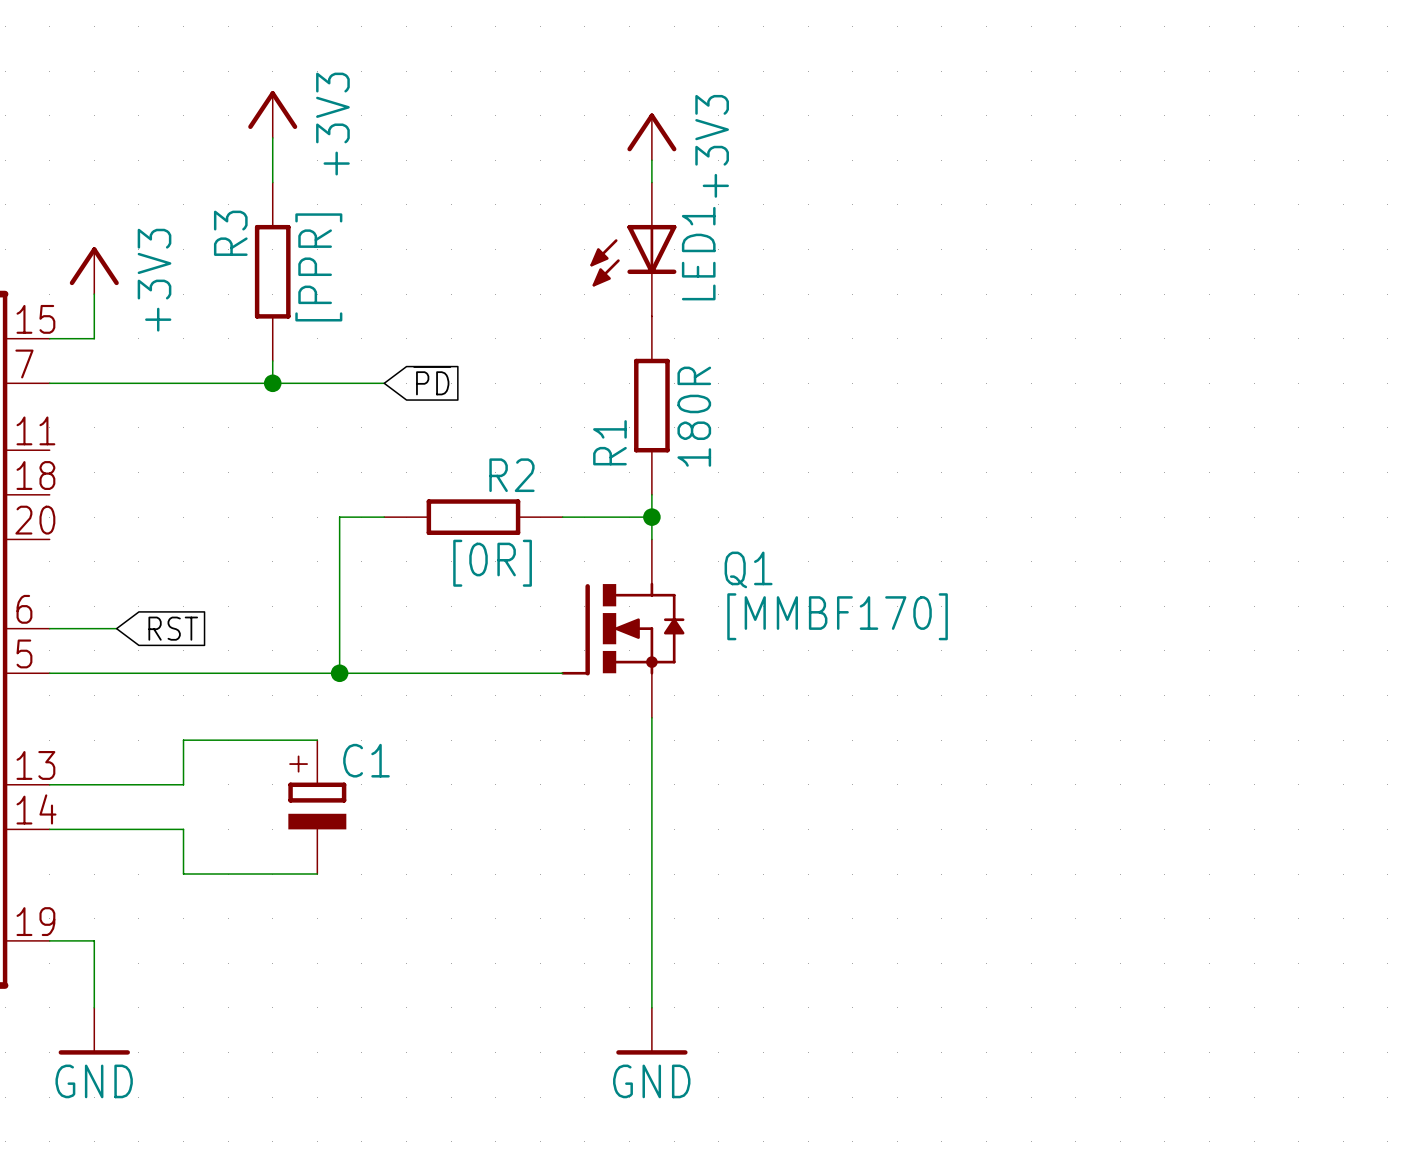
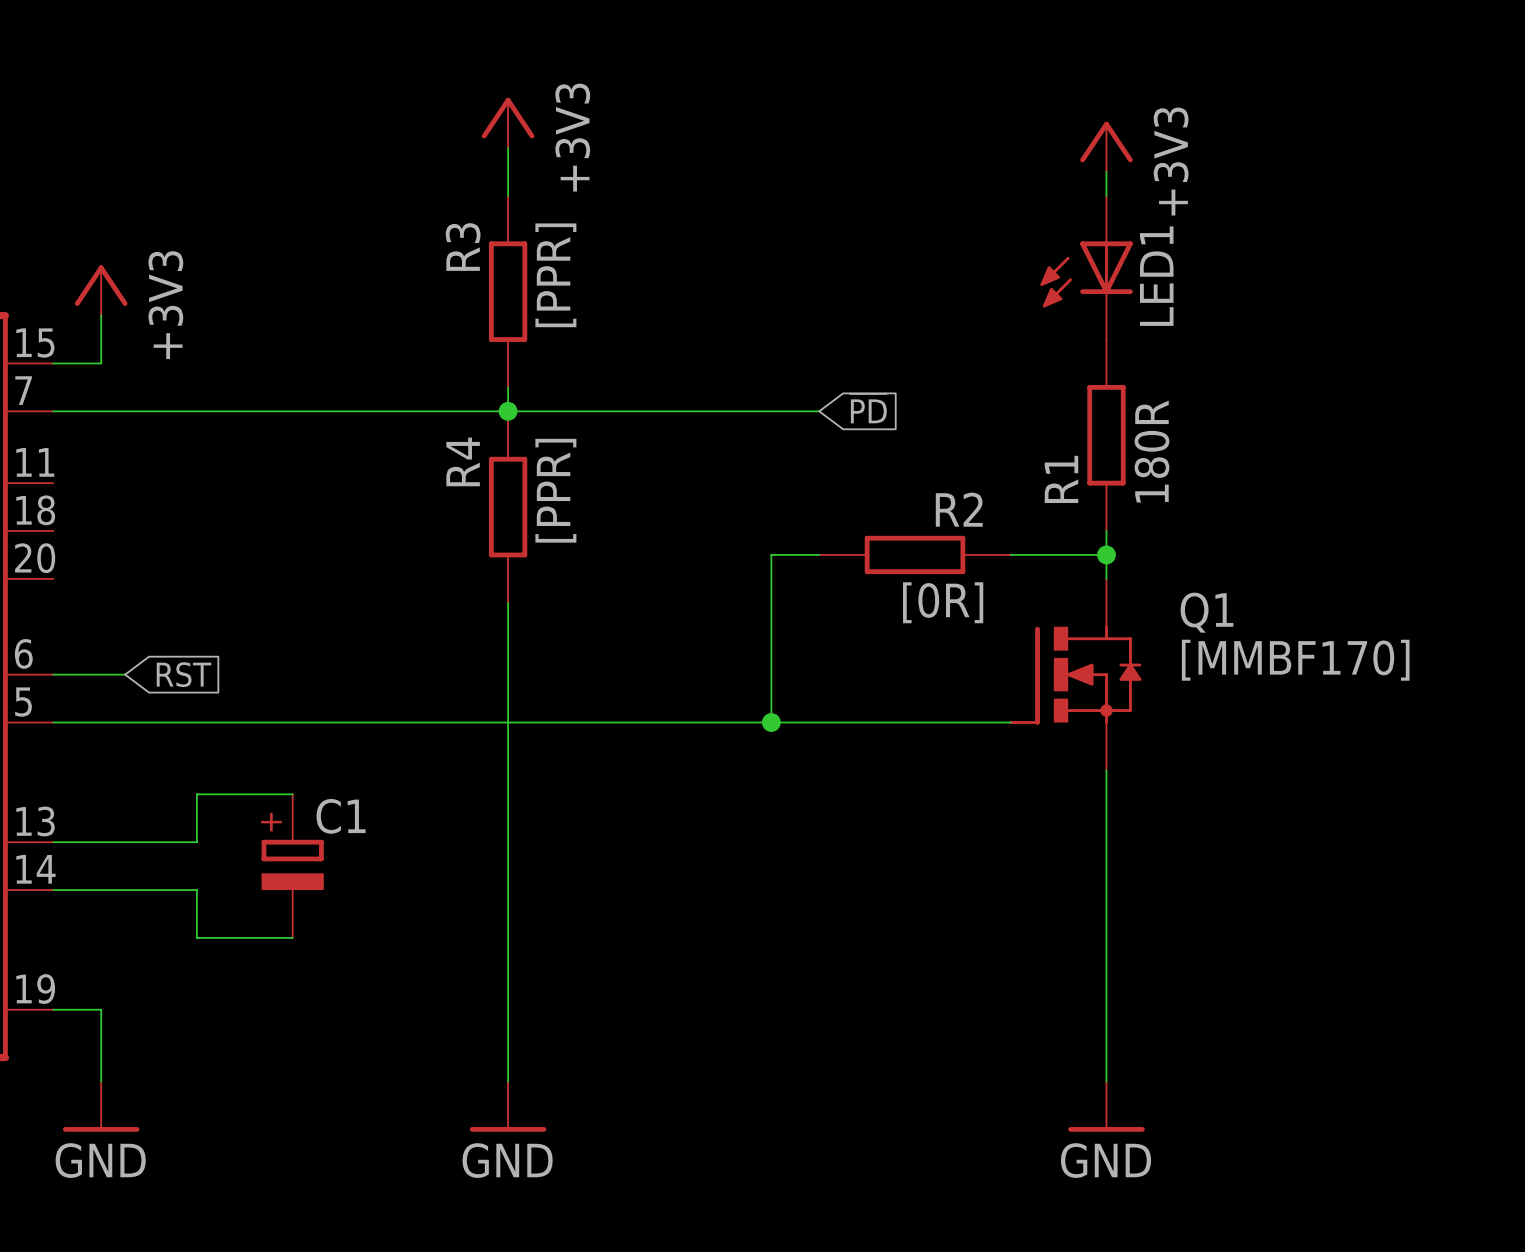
power symbol: +3V3 (272, 114) -> none
power symbol: none -> +3V3 (508, 122)
power symbol: +3V3 (651, 136) -> none
power symbol: none -> +3V3 (1106, 146)
wire: (272, 137) (272, 182) -> (508, 148) (508, 195)
wire: (651, 160) (651, 182) -> (1106, 171) (1106, 195)
LED1 position: (633, 249) -> (1086, 267)
R3 position: (272, 271) -> (508, 291)
wire: (272, 361) (272, 383) -> (508, 387) (508, 411)
global label position: ~{PD} (432, 380) -> ~{PD} (868, 408)
junction: (272, 383) -> none
wire: none -> (412, 411) (819, 411)
junction: none -> (508, 411)
R1 position: (651, 405) -> (1106, 435)
R4: none -> [PPR] (508, 507)
wire: (651, 494) (651, 539) -> (1106, 531) (1106, 578)
wire: (384, 517) (339, 517) (339, 673) -> (819, 554) (771, 554) (771, 722)
R2 position: (473, 517) -> (915, 554)
wire: (562, 517) (651, 517) -> (1010, 554) (1106, 554)
junction: (651, 517) -> none
junction: none -> (1106, 554)
wire: none -> (508, 602) (508, 1081)
Q1 position: (622, 628) -> (1075, 674)
junction: (339, 673) -> none
wire: none -> (603, 722) (1010, 722)
junction: none -> (771, 722)
wire: (651, 717) (651, 1007) -> (1106, 770) (1106, 1081)
wire: (272, 740) (317, 740) -> none
C1 position: (317, 807) -> (292, 866)
wire: (272, 874) (317, 874) -> none
power symbol position: GND (651, 1031) -> GND (508, 1106)
power symbol: none -> GND (1106, 1106)

